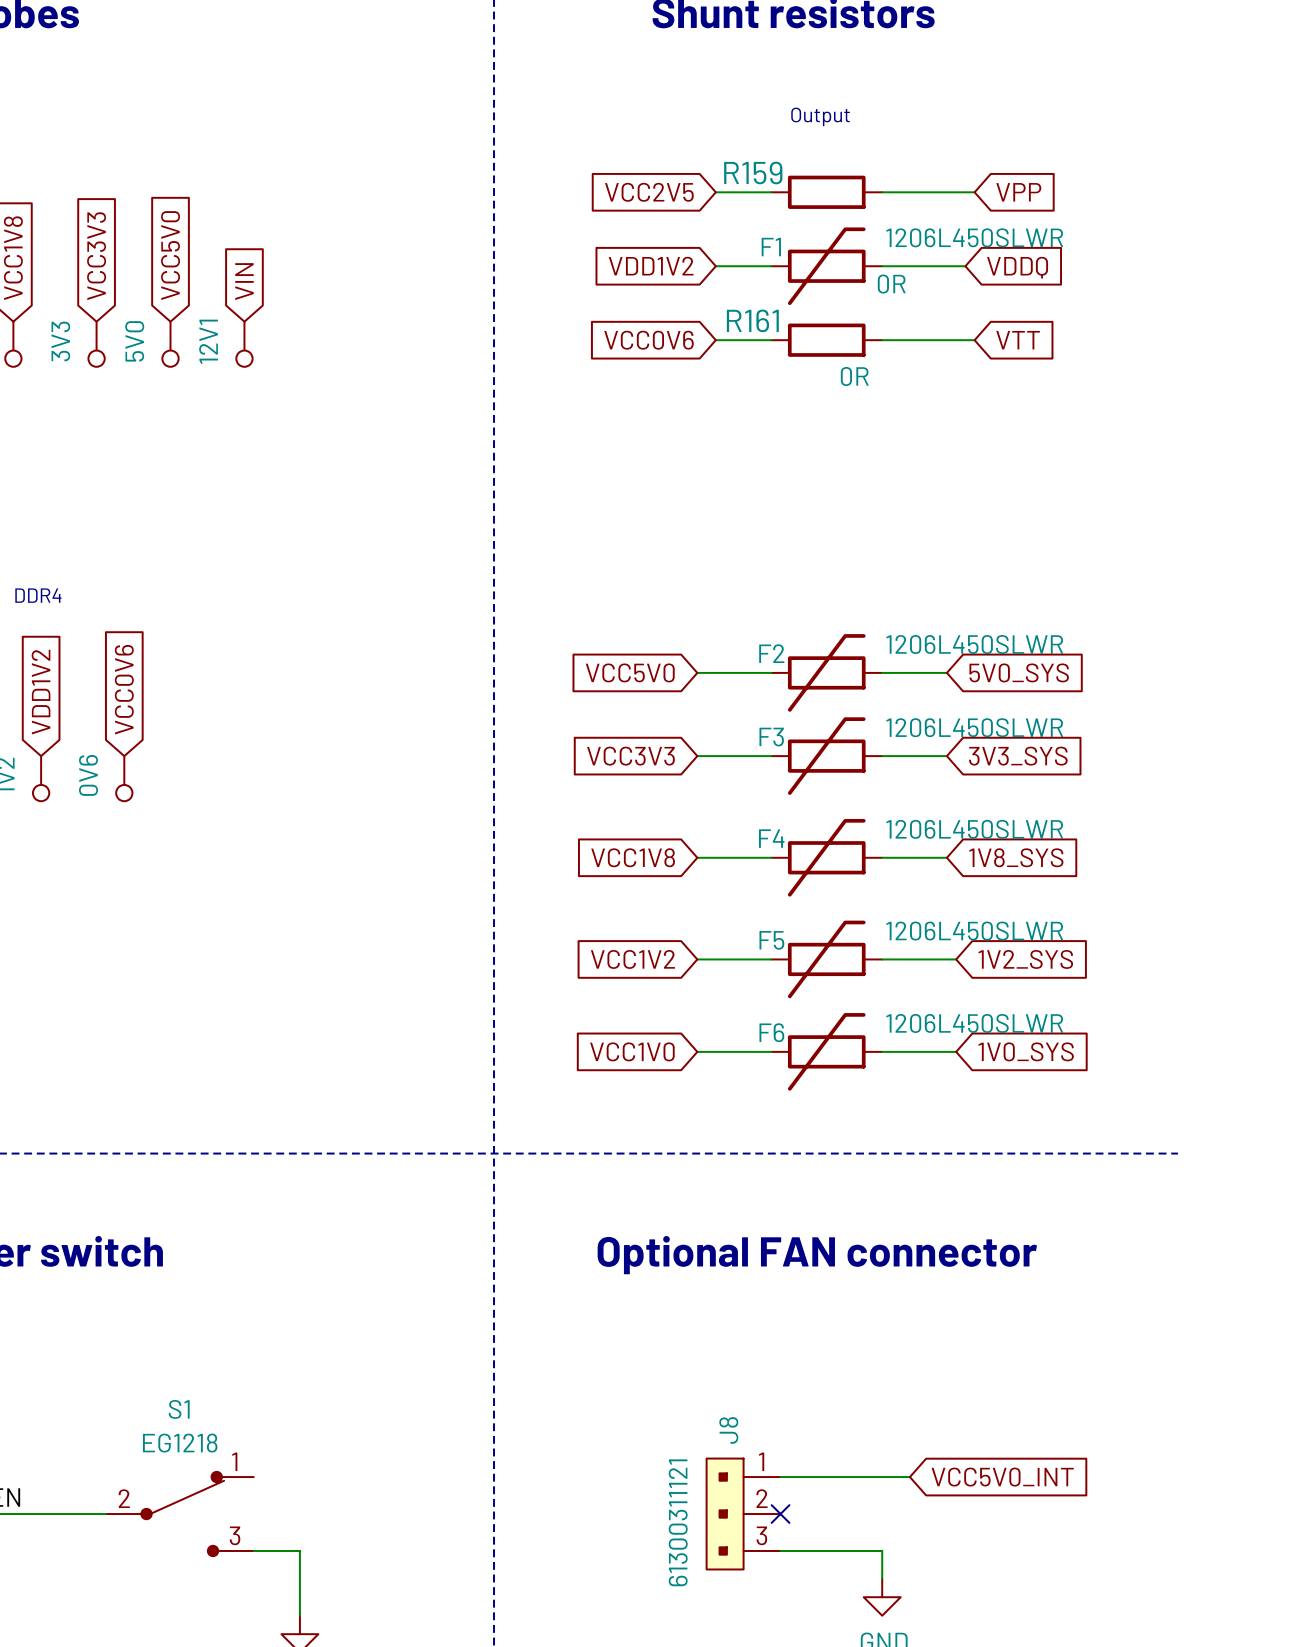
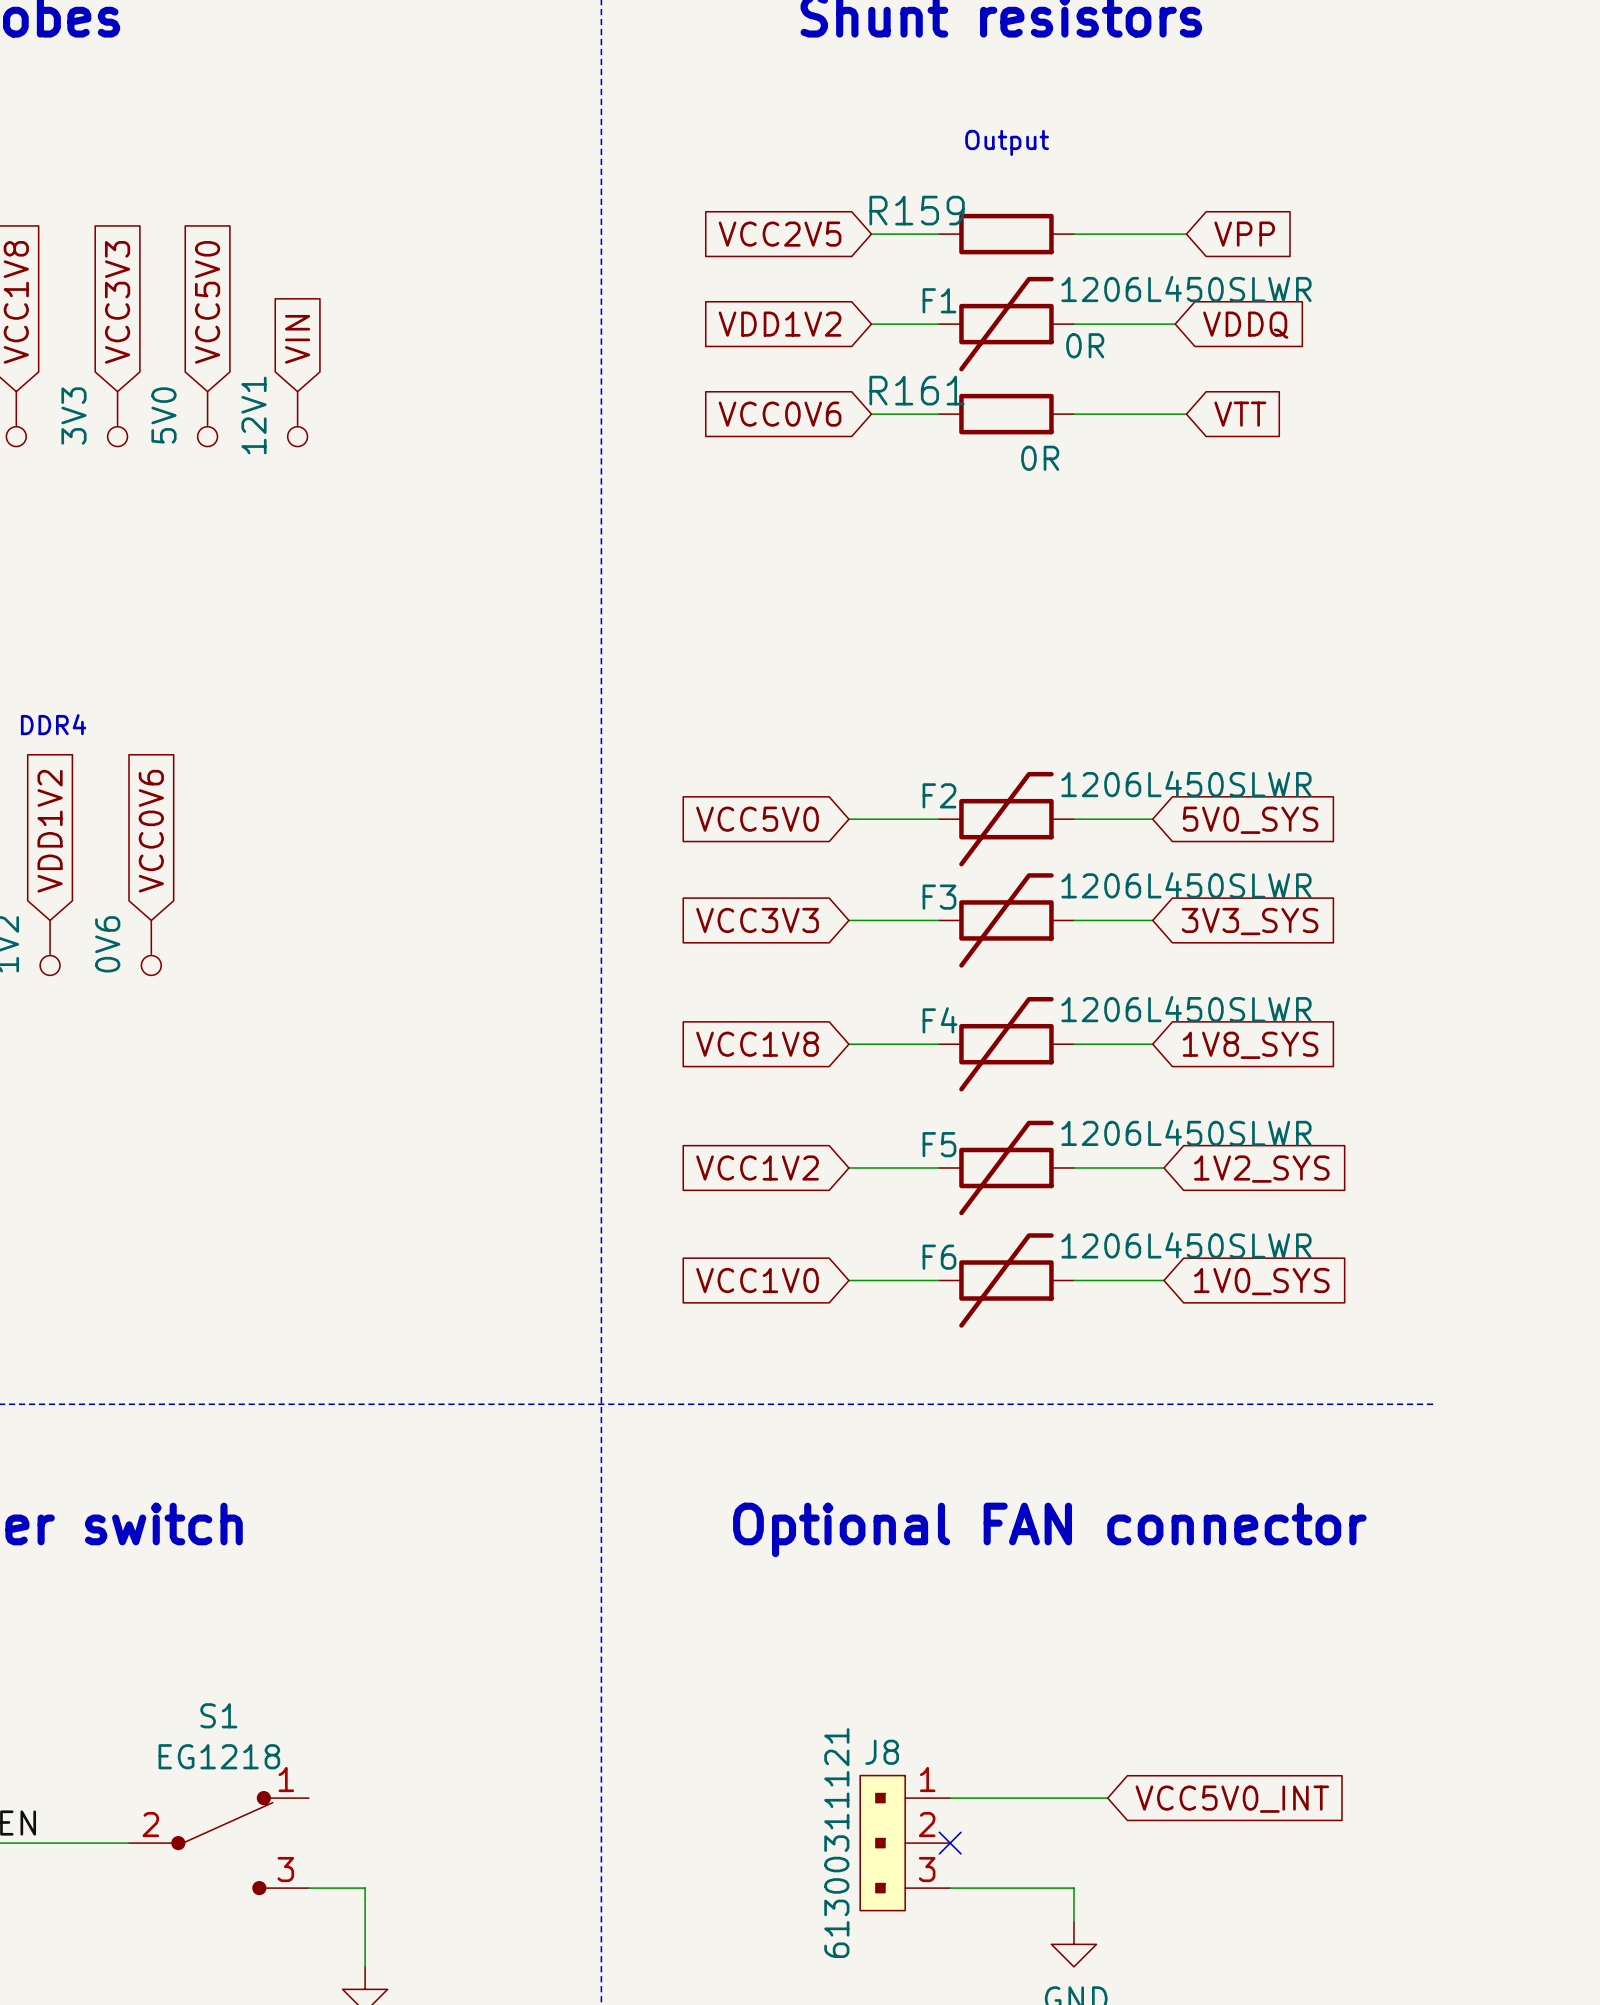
J8 name rotation: 0° (728, 1430) -> 90° clockwise (882, 1752)
J8 value position: 61300311121 (678, 1522) -> 61300311121 (836, 1843)

